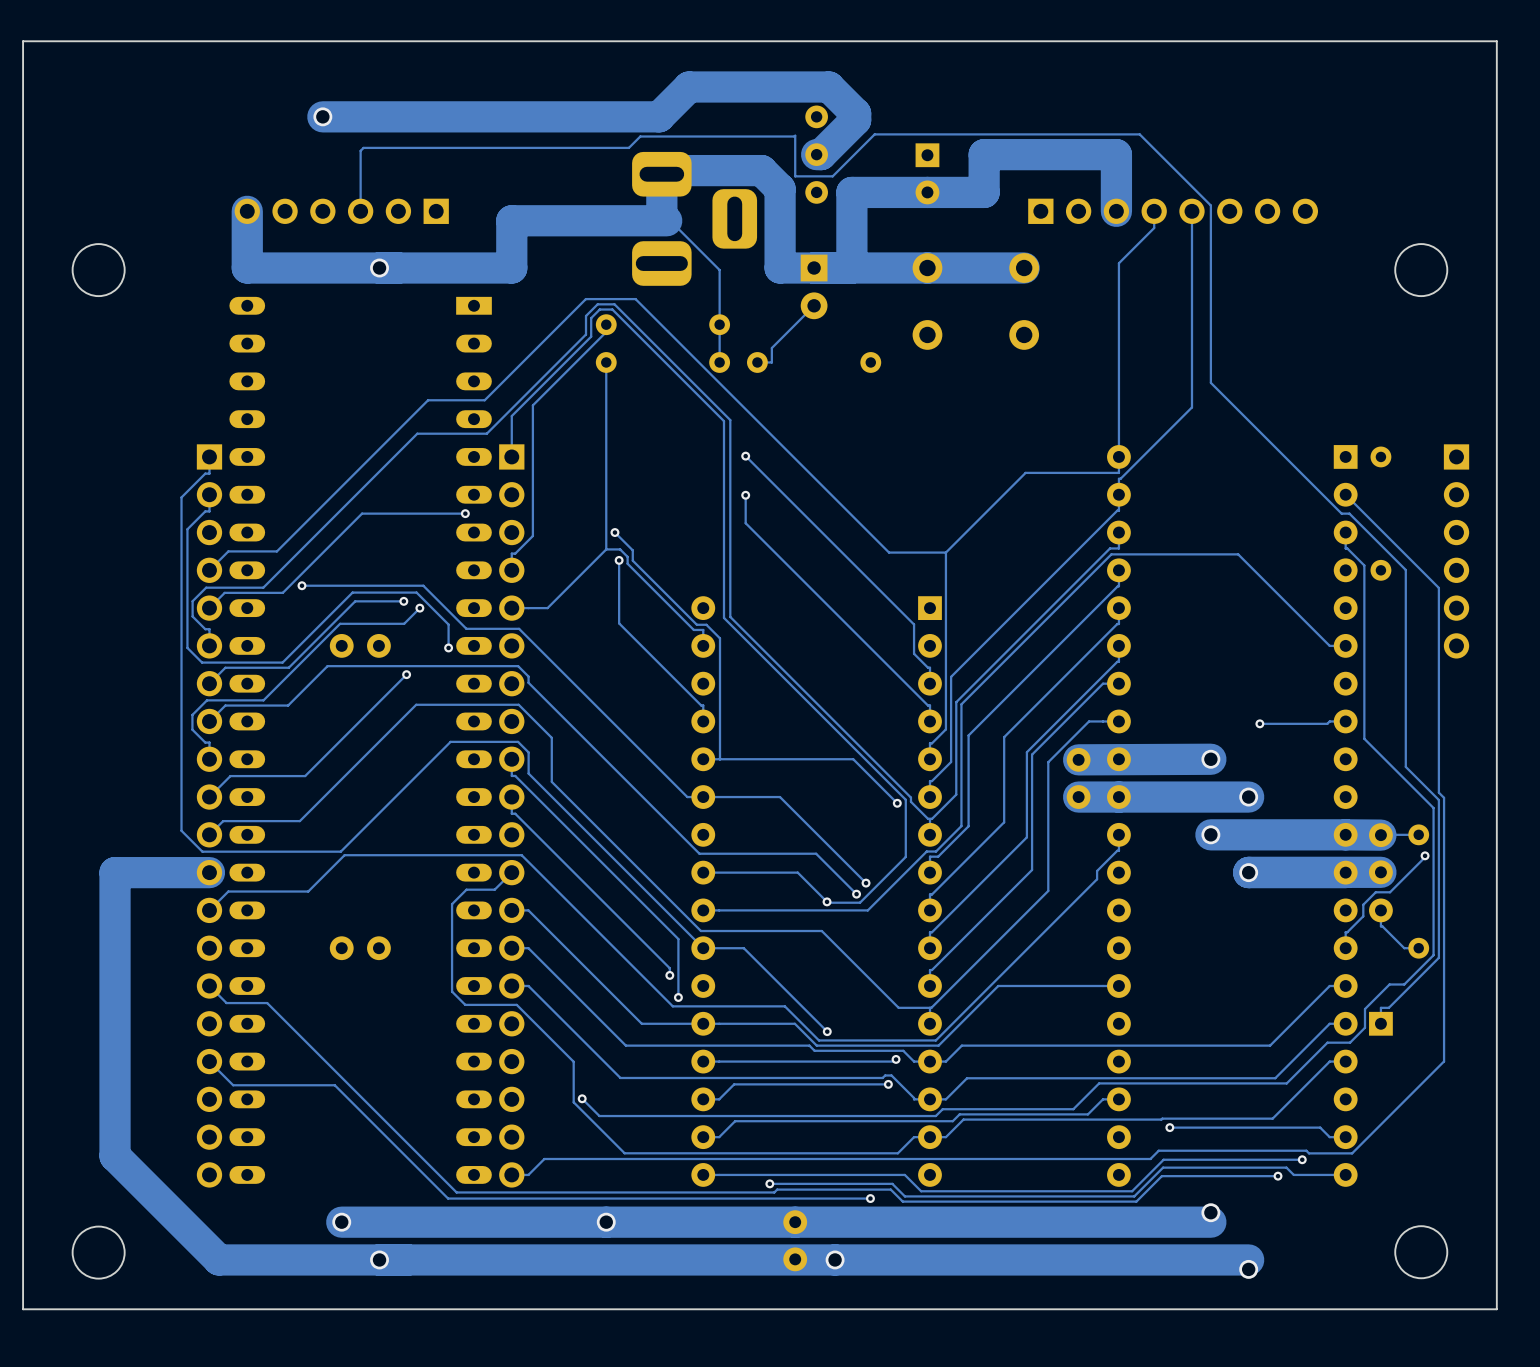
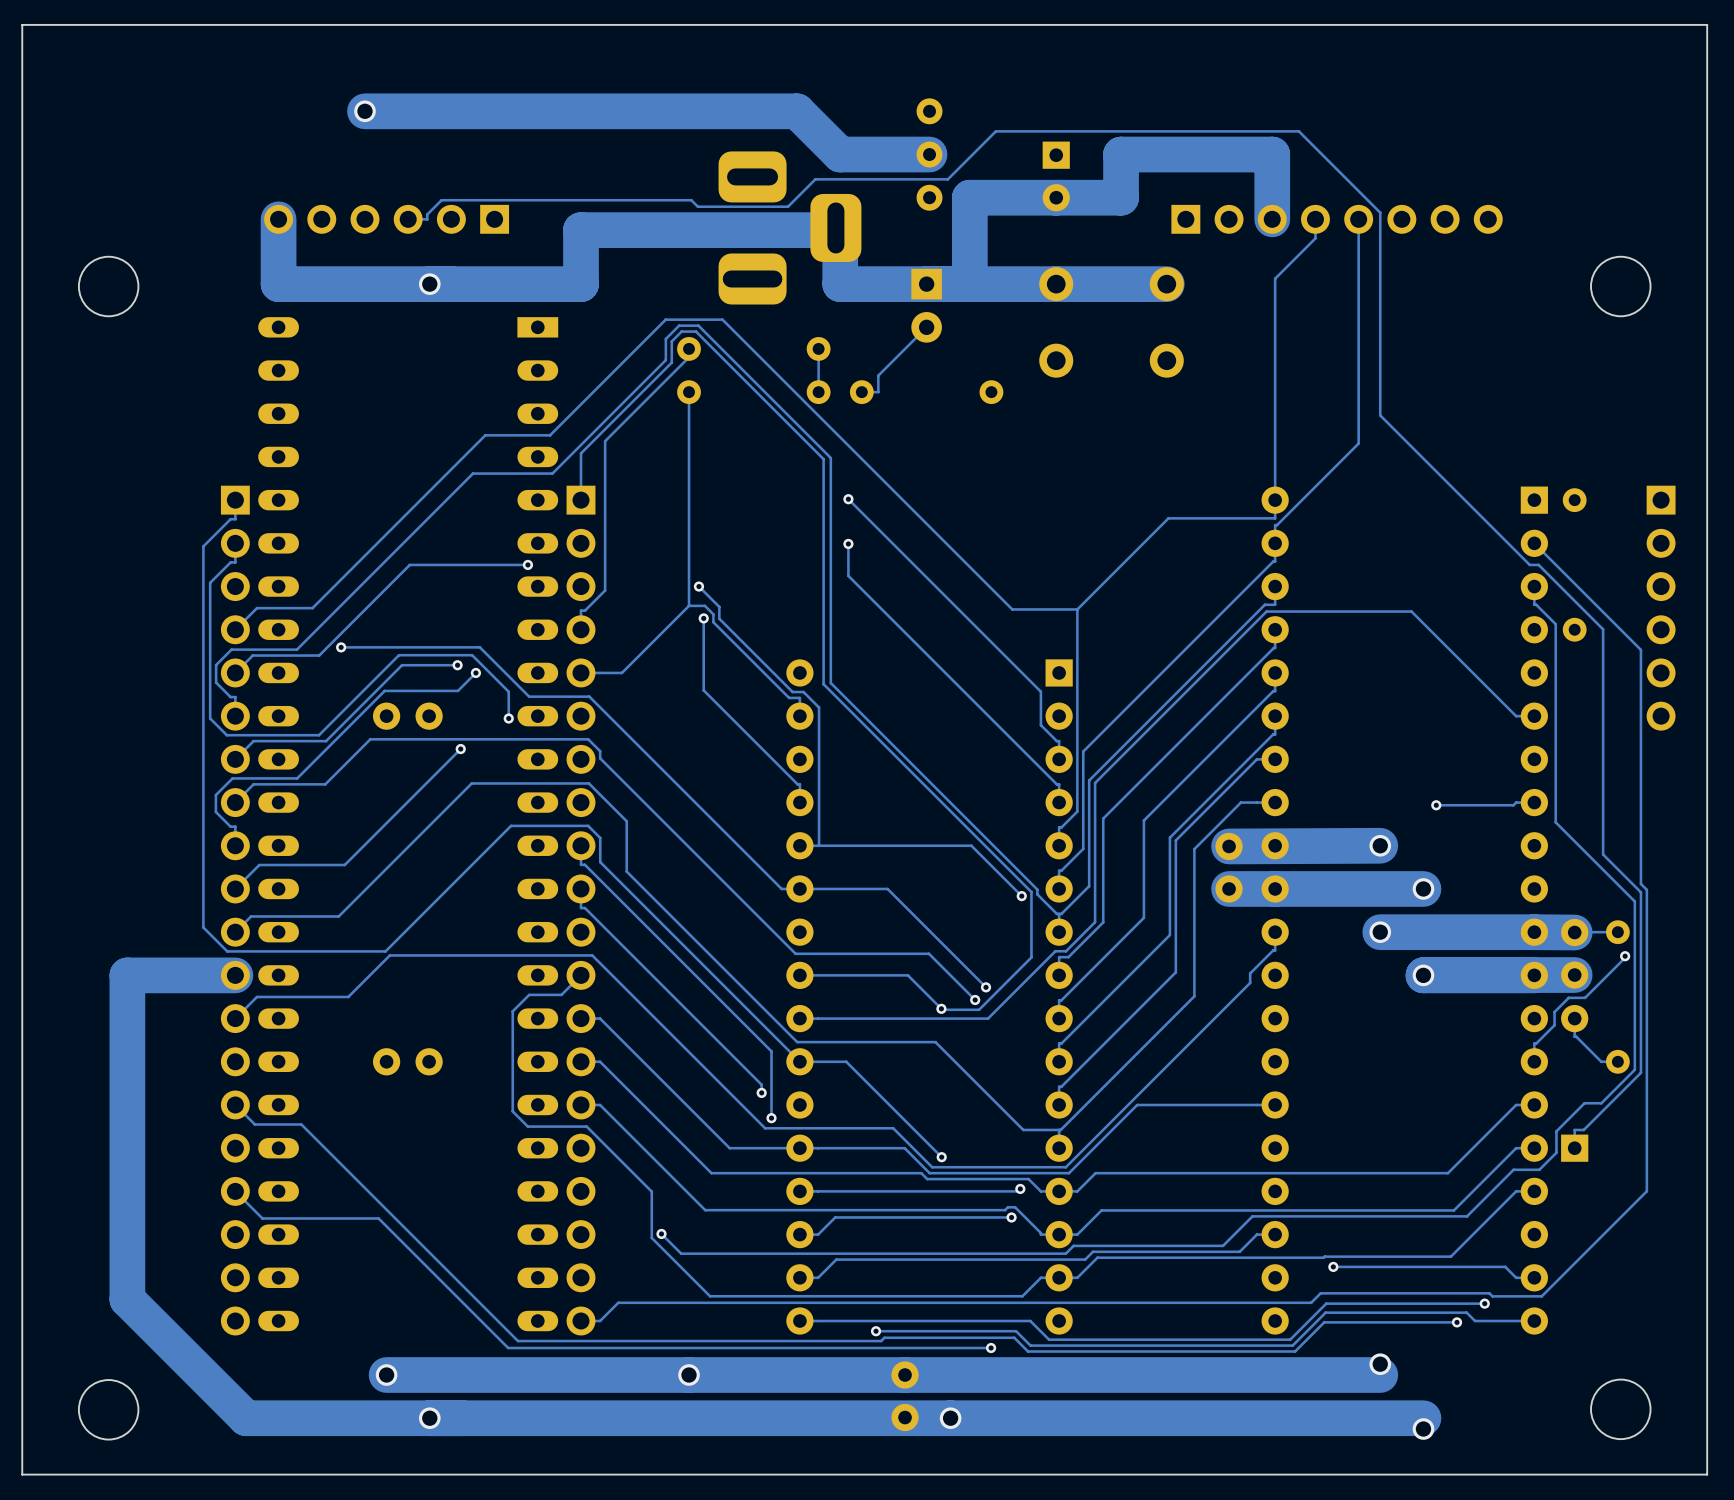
track: (659, 116) (689, 86) (829, 86) (855, 113) (855, 120) (821, 154) (816, 154) -> (749, 111) (797, 111) (840, 154) (929, 154)
track: (795, 176) (795, 135) (640, 136) (628, 147) (363, 147) (360, 150) (360, 211) -> (905, 179) (815, 179) (788, 206) (697, 206) (691, 200) (441, 200) (427, 214) (427, 219) (408, 219)
track: (661, 219) (661, 174) (665, 170) (761, 170) (780, 189) (780, 268) -> (762, 230) (834, 230) (837, 227) (840, 230) (840, 284) (887, 284)
track: (670, 220) (719, 270) (719, 324) -> none

